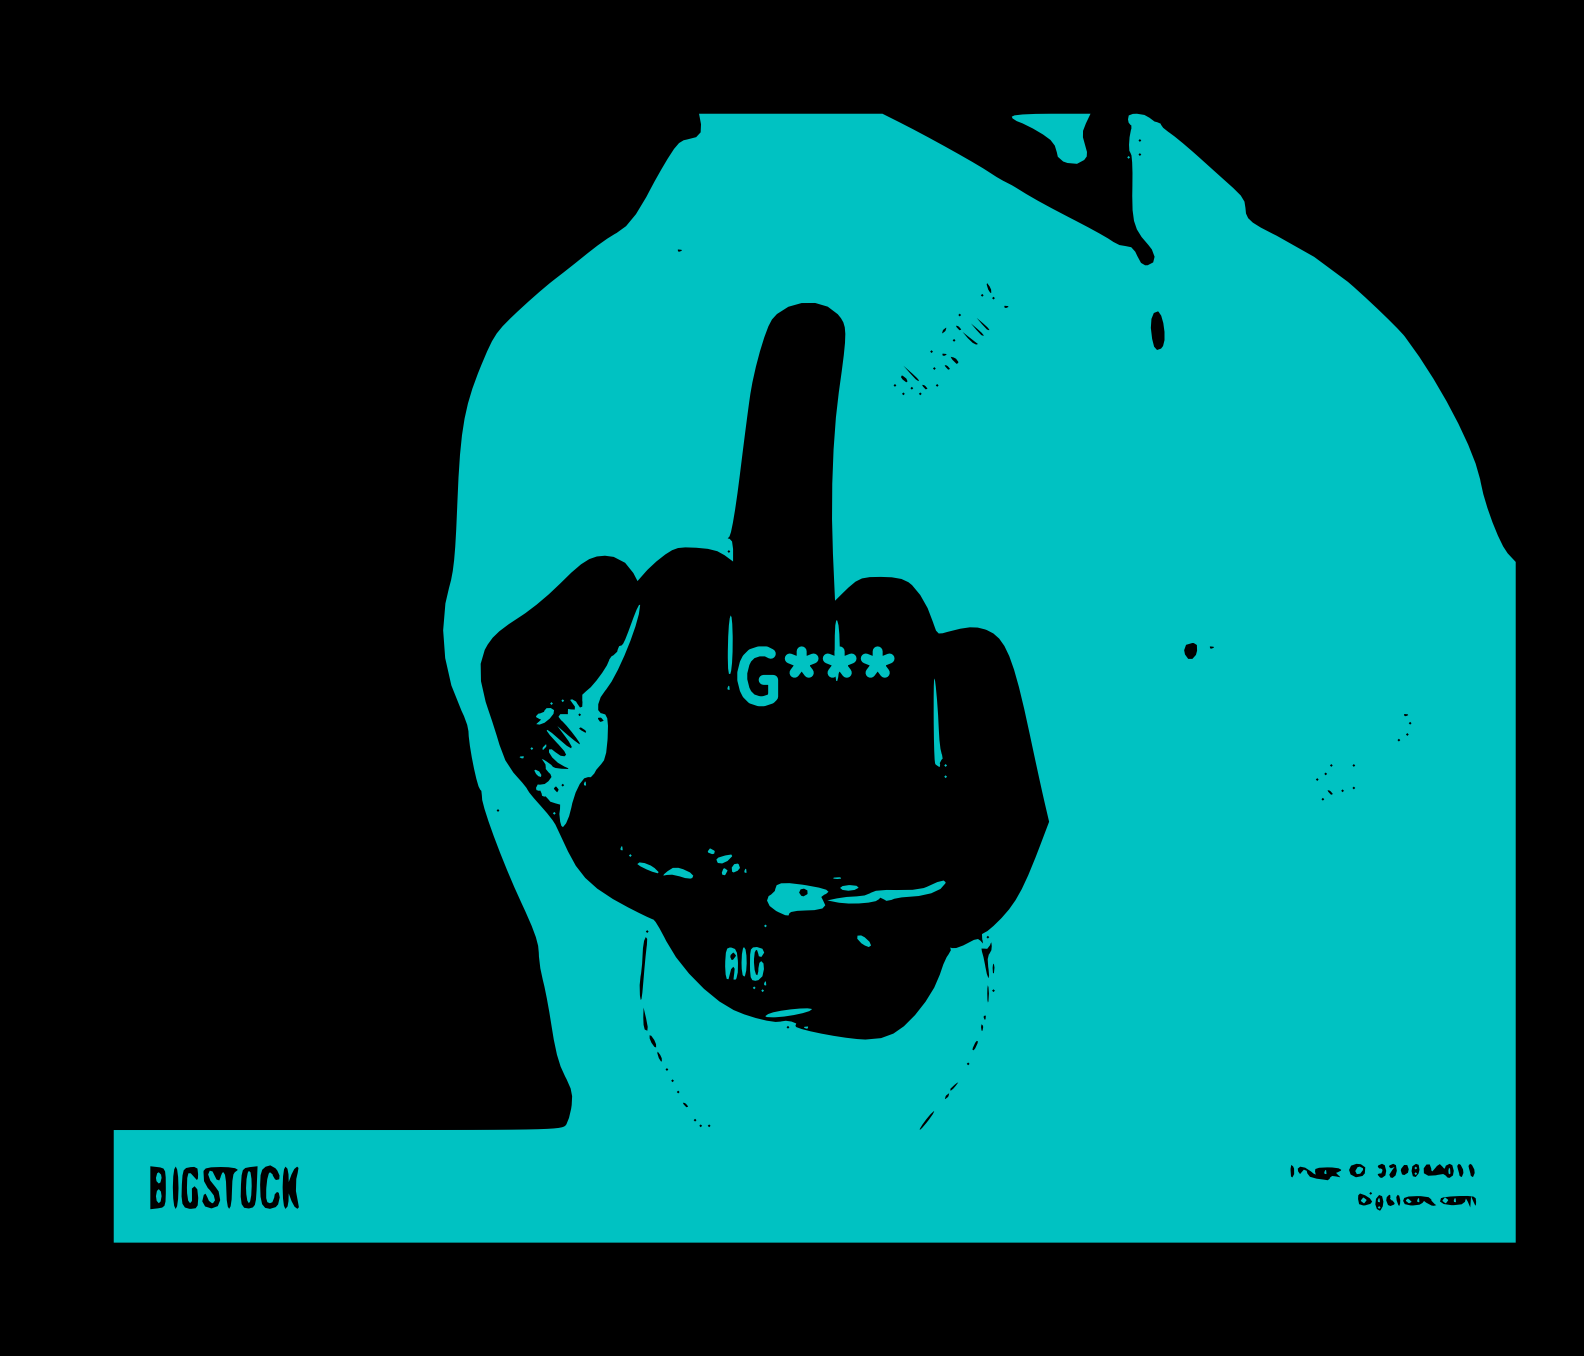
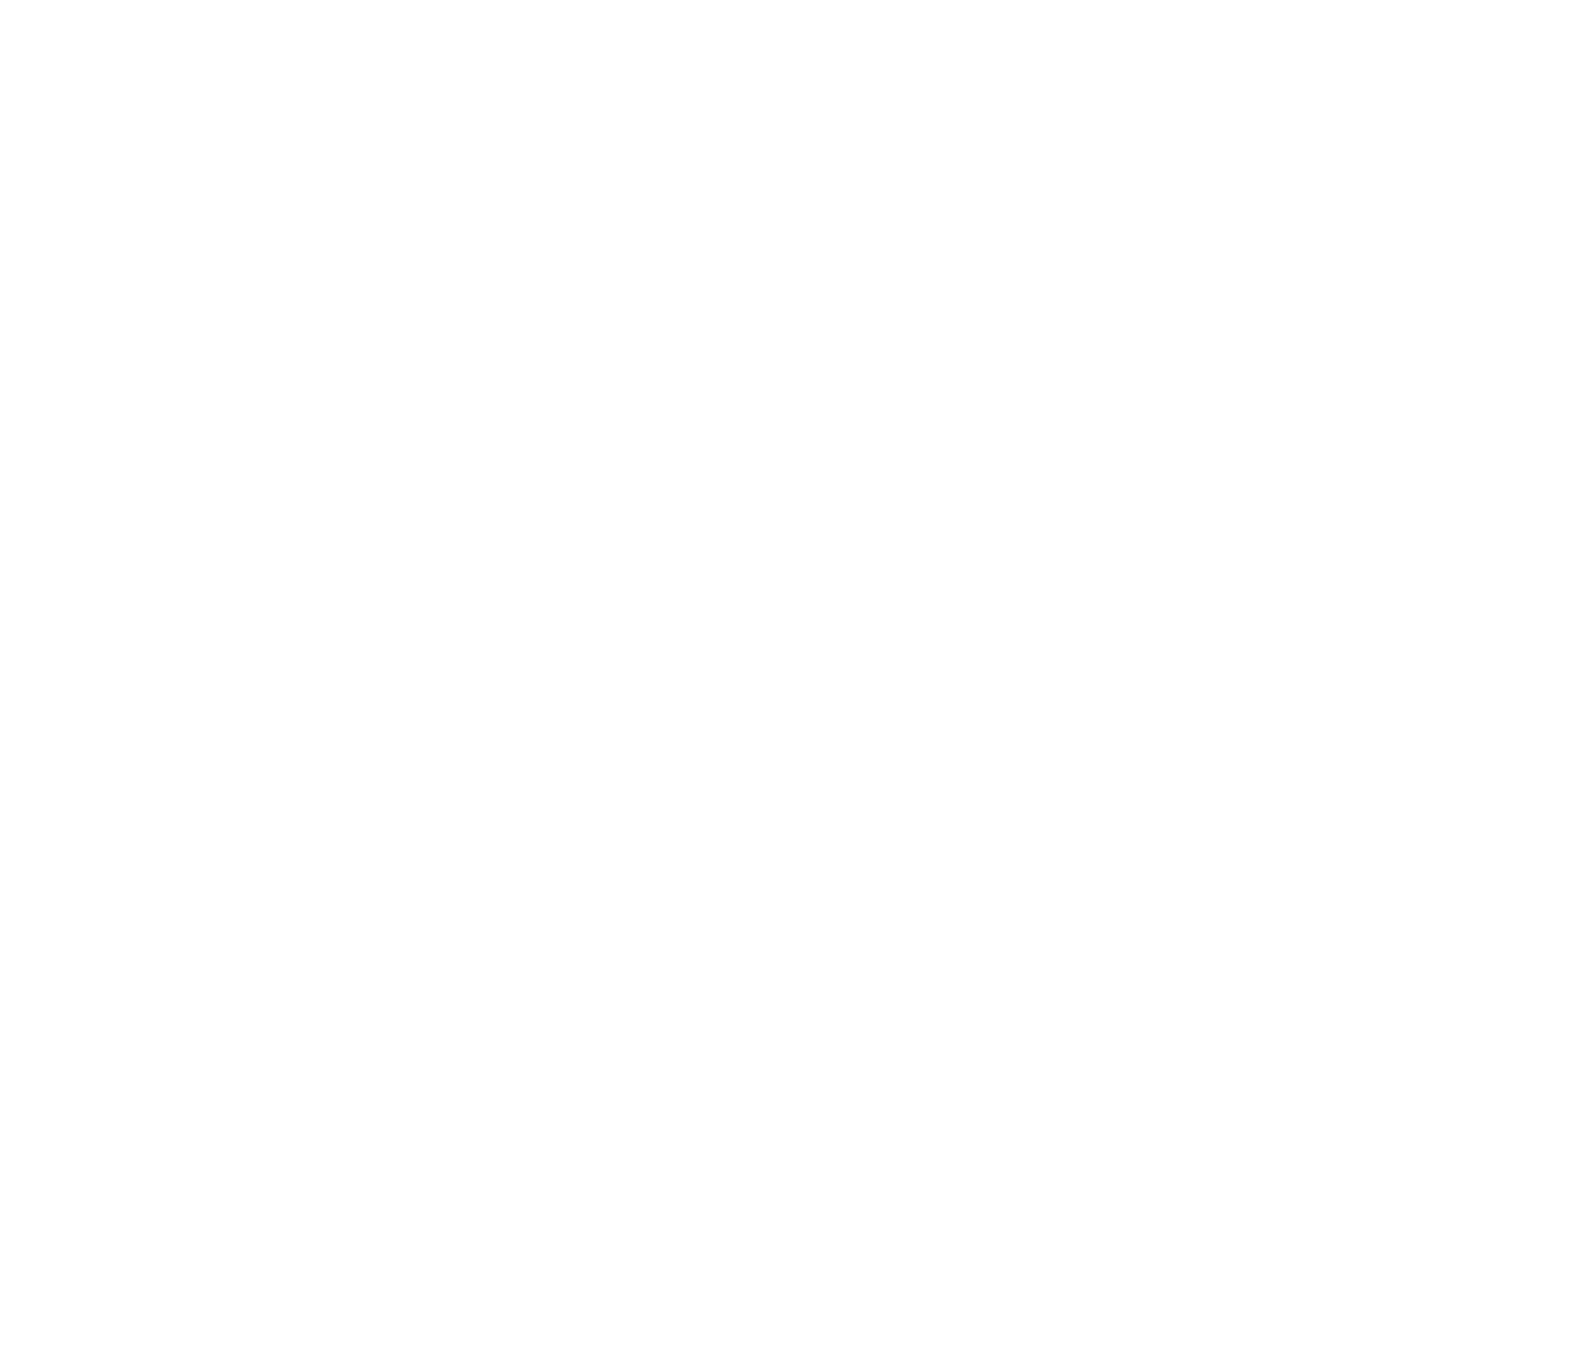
G***: (814, 678) -> none

